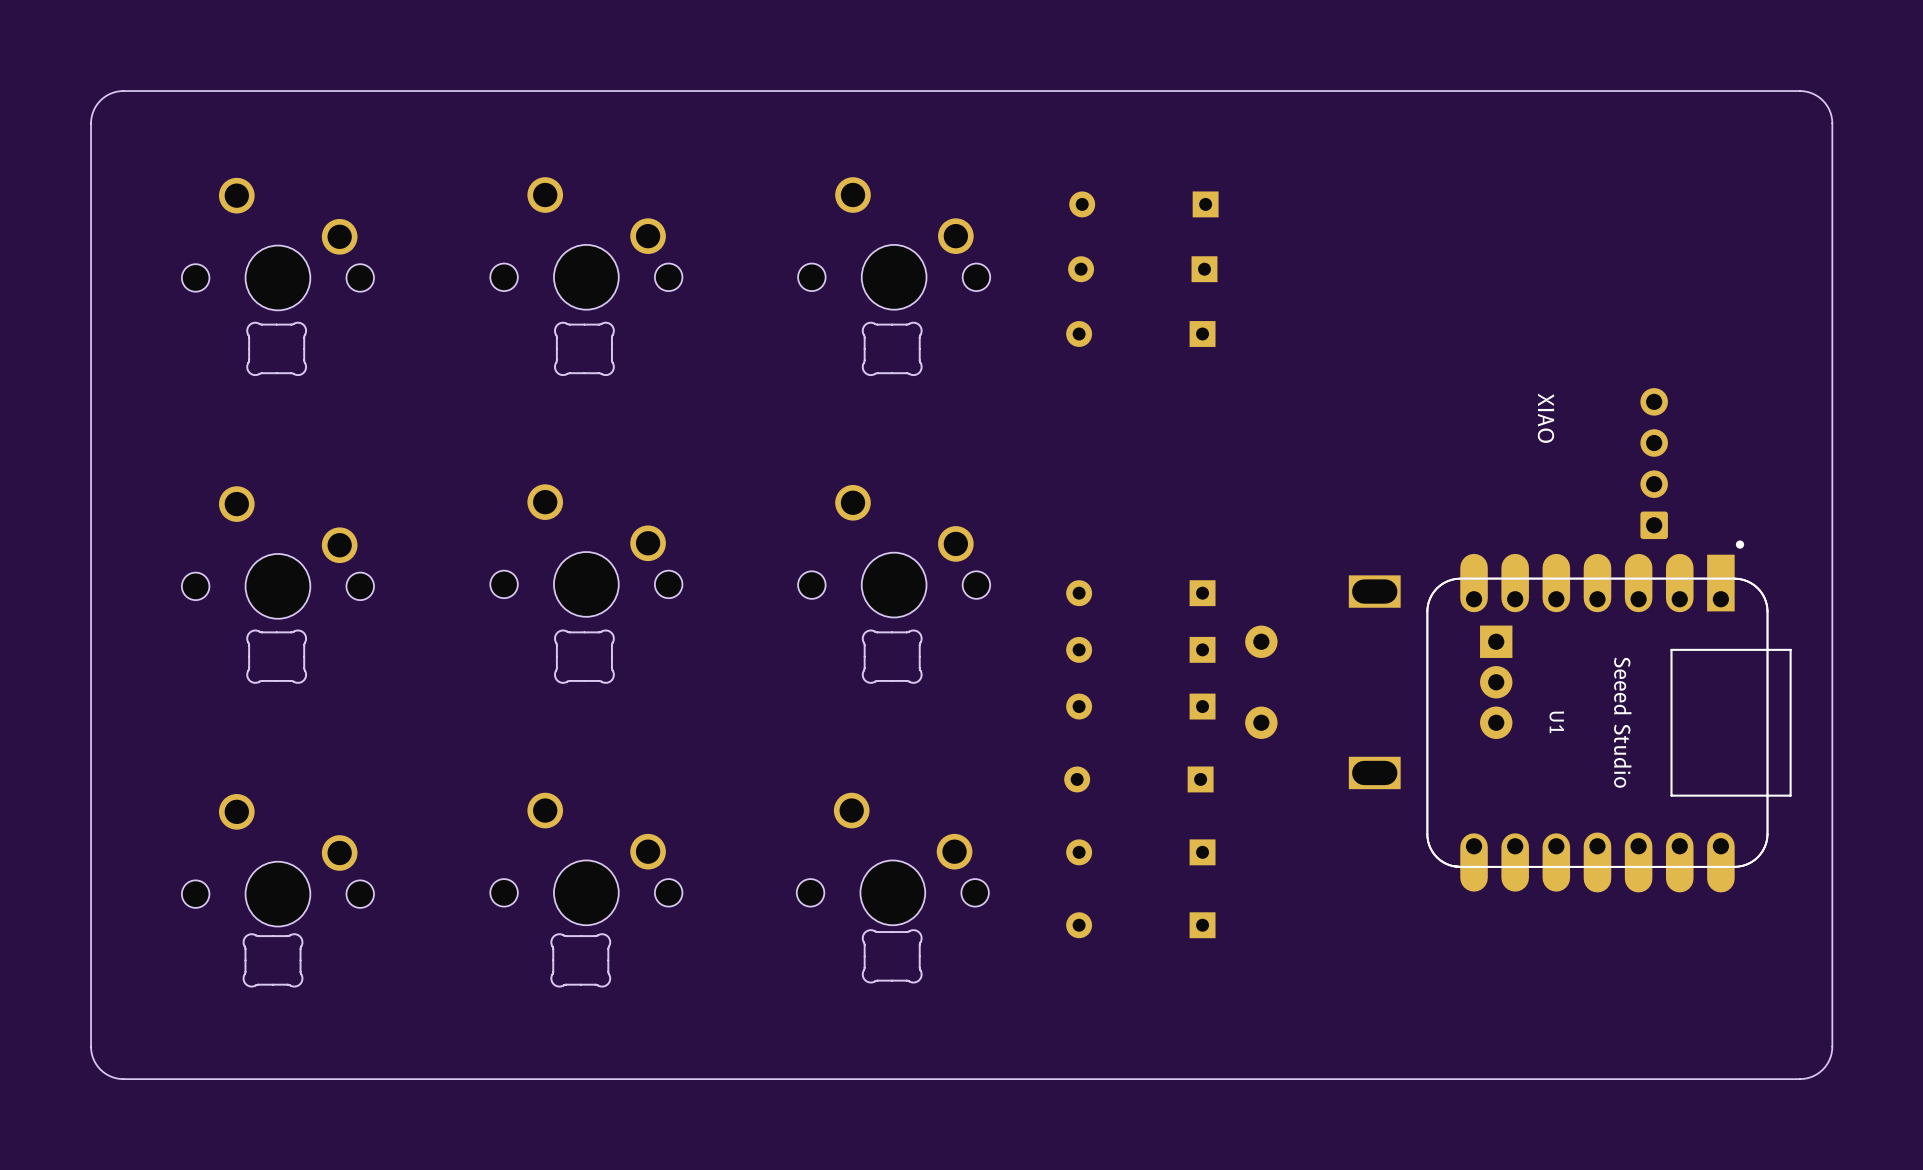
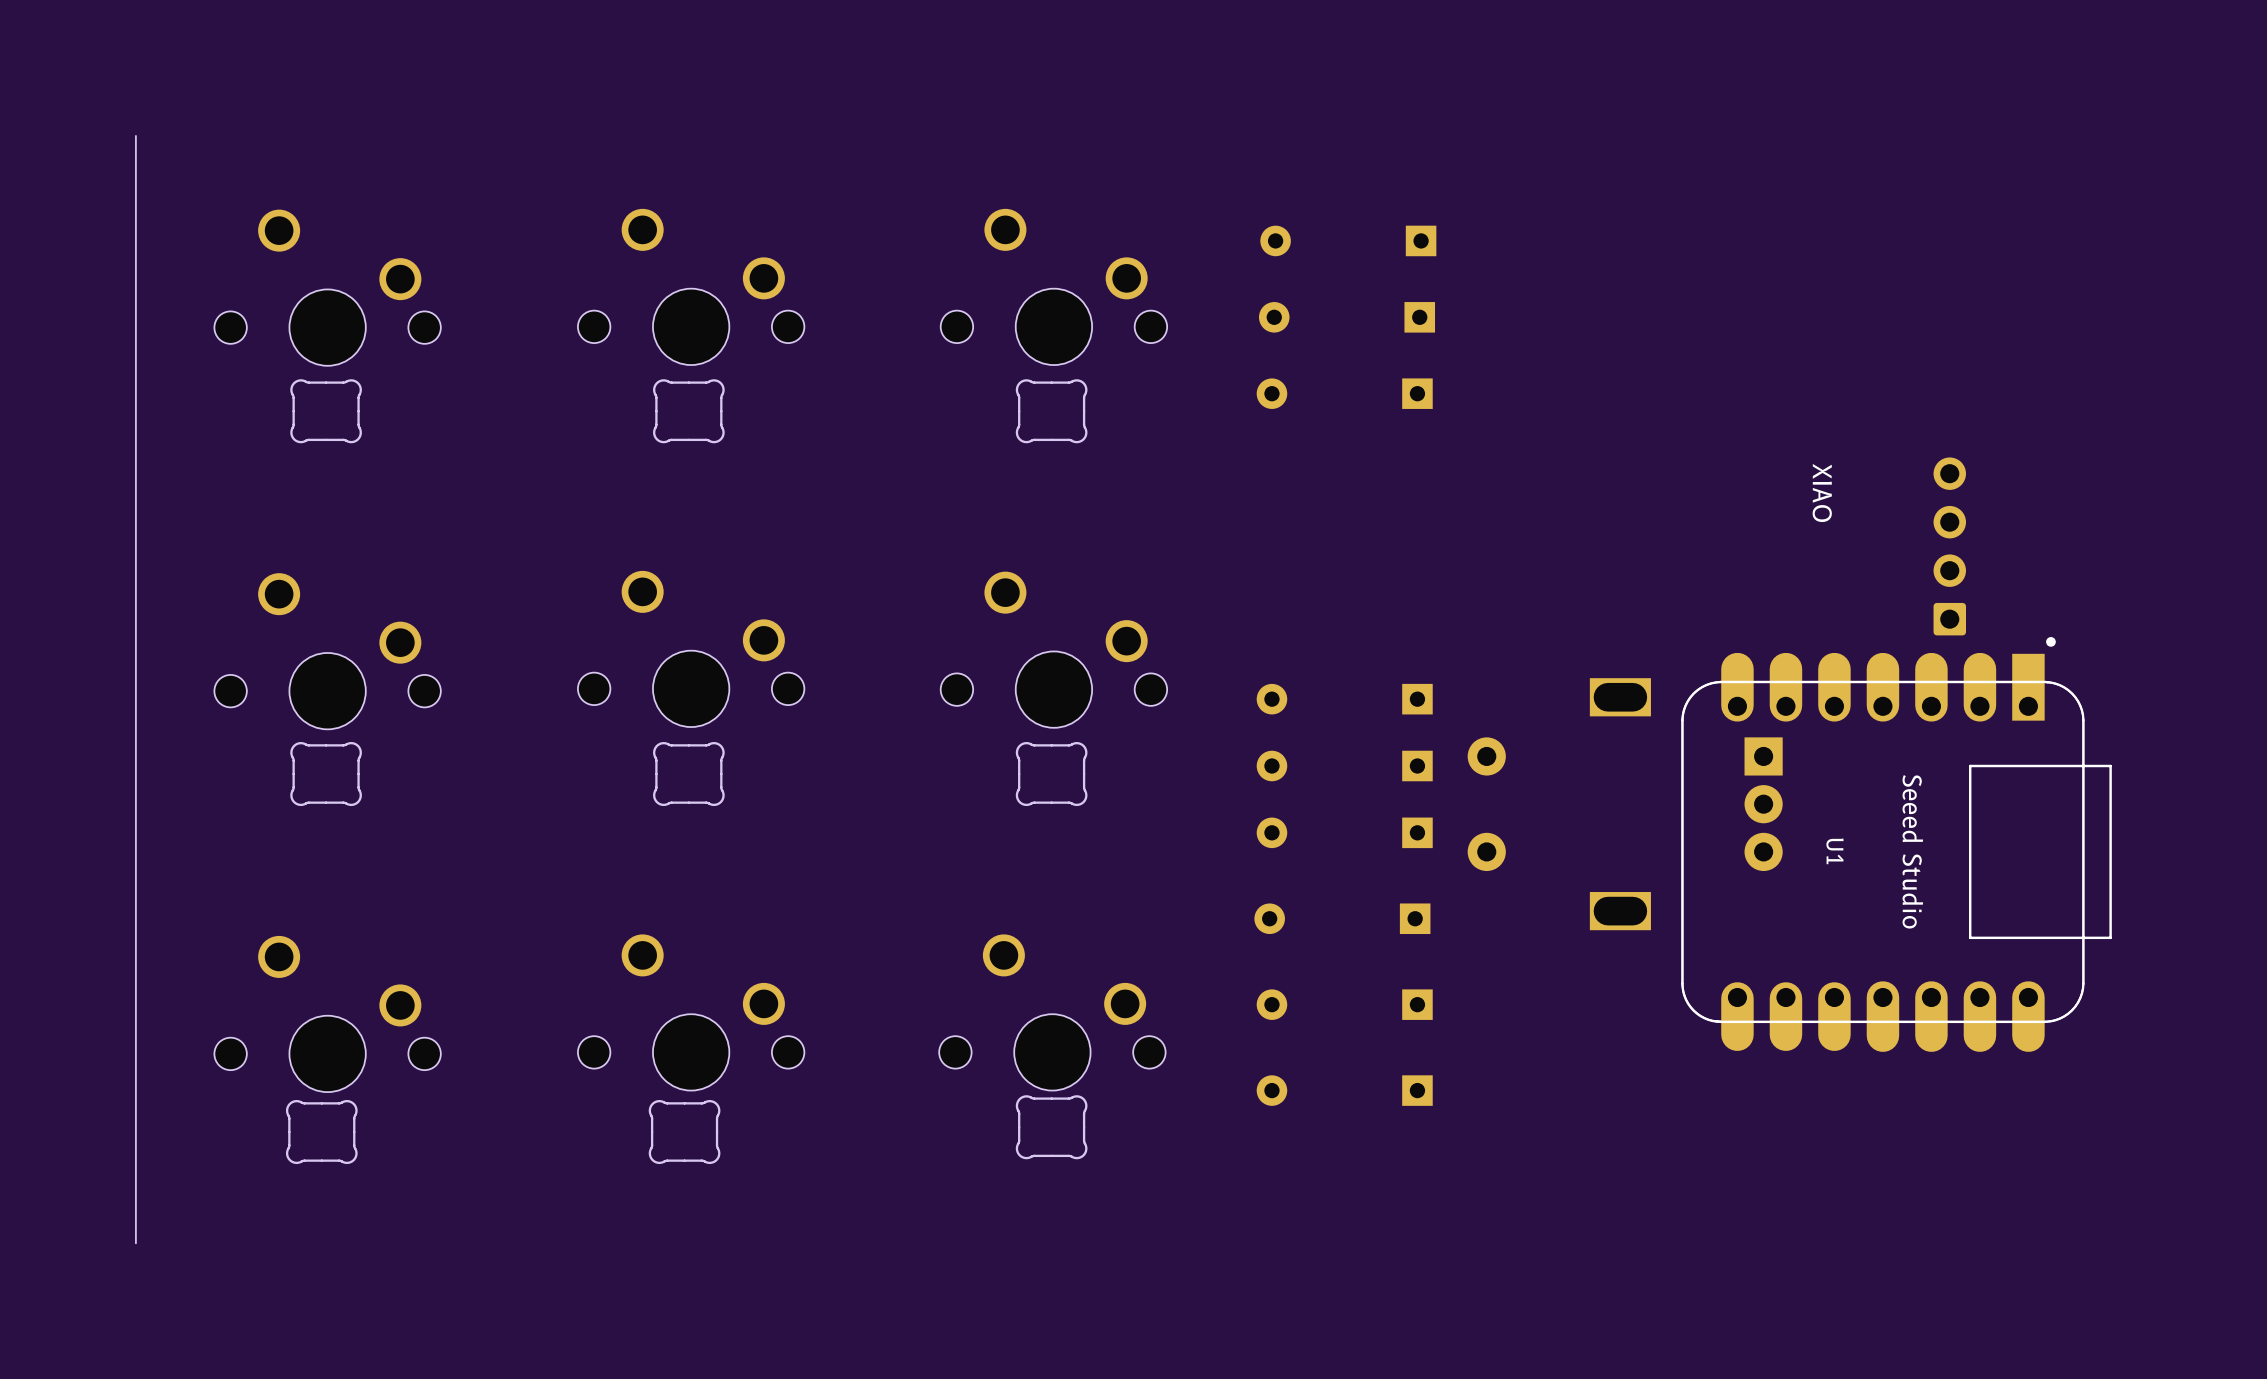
board edge: (1799, 91) (123, 91) (106, 95) (94, 109) (91, 123) (91, 1046) (95, 1063) (109, 1075) (123, 1079) (1799, 1079) (1817, 1074) (1829, 1060) (1832, 1046) (1832, 123) (1830, 112) (1822, 100) (1814, 94) (1799, 91) -> none
board edge: none -> (135, 135) (135, 1243)

